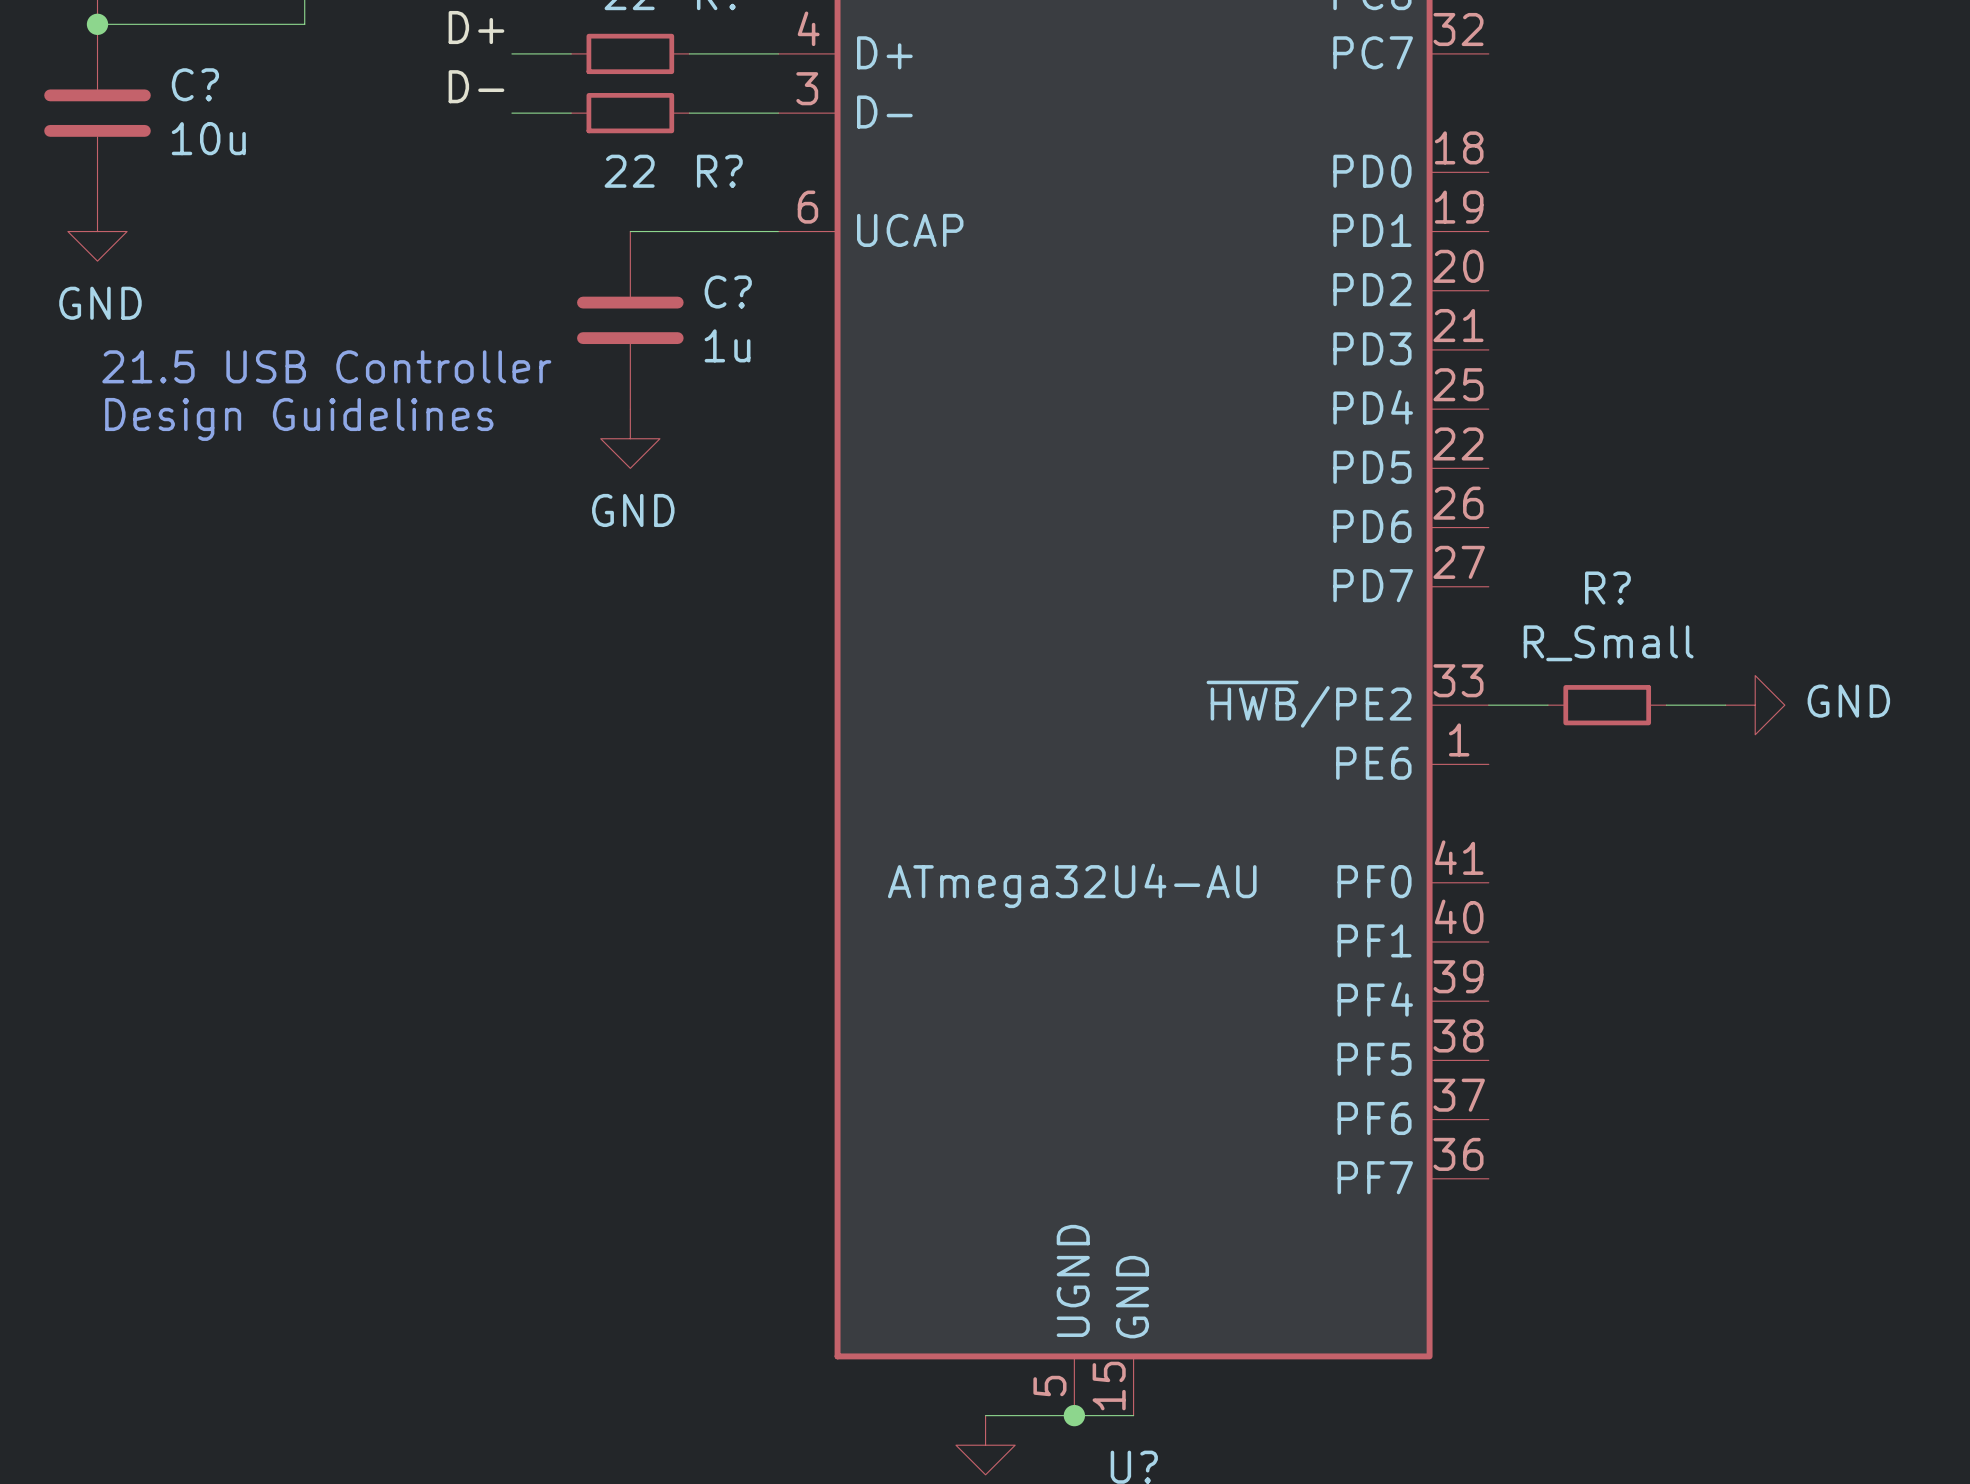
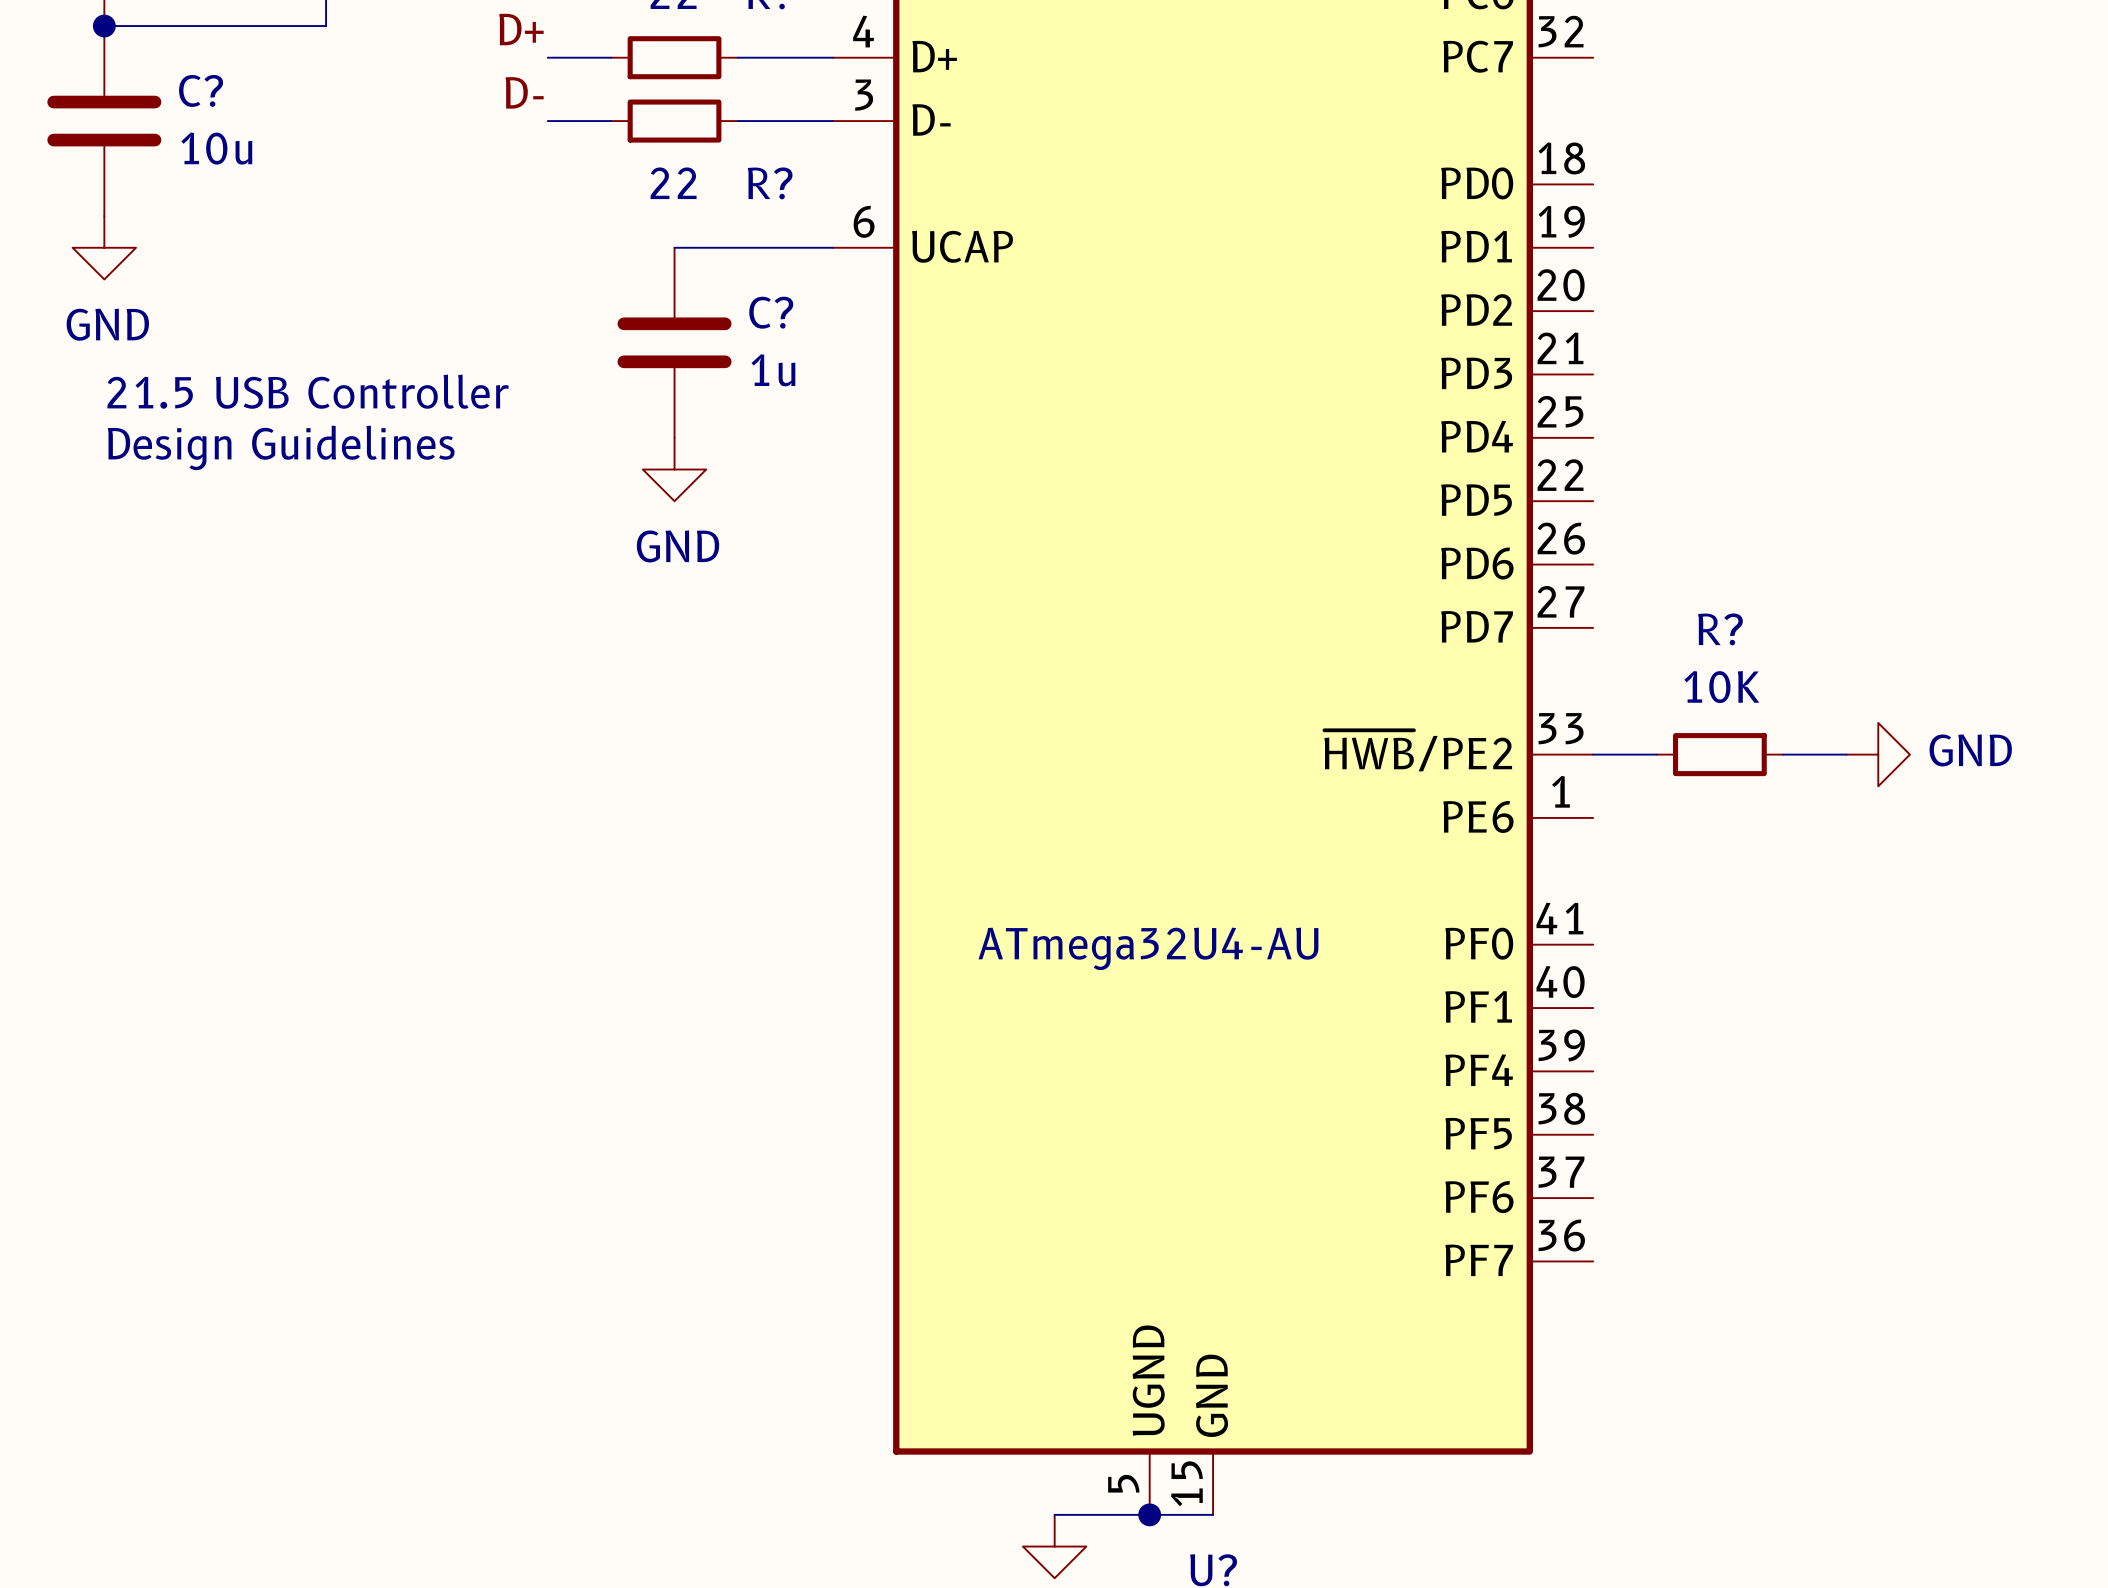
R? value: R_Small (1608, 643) -> 10K (1721, 687)

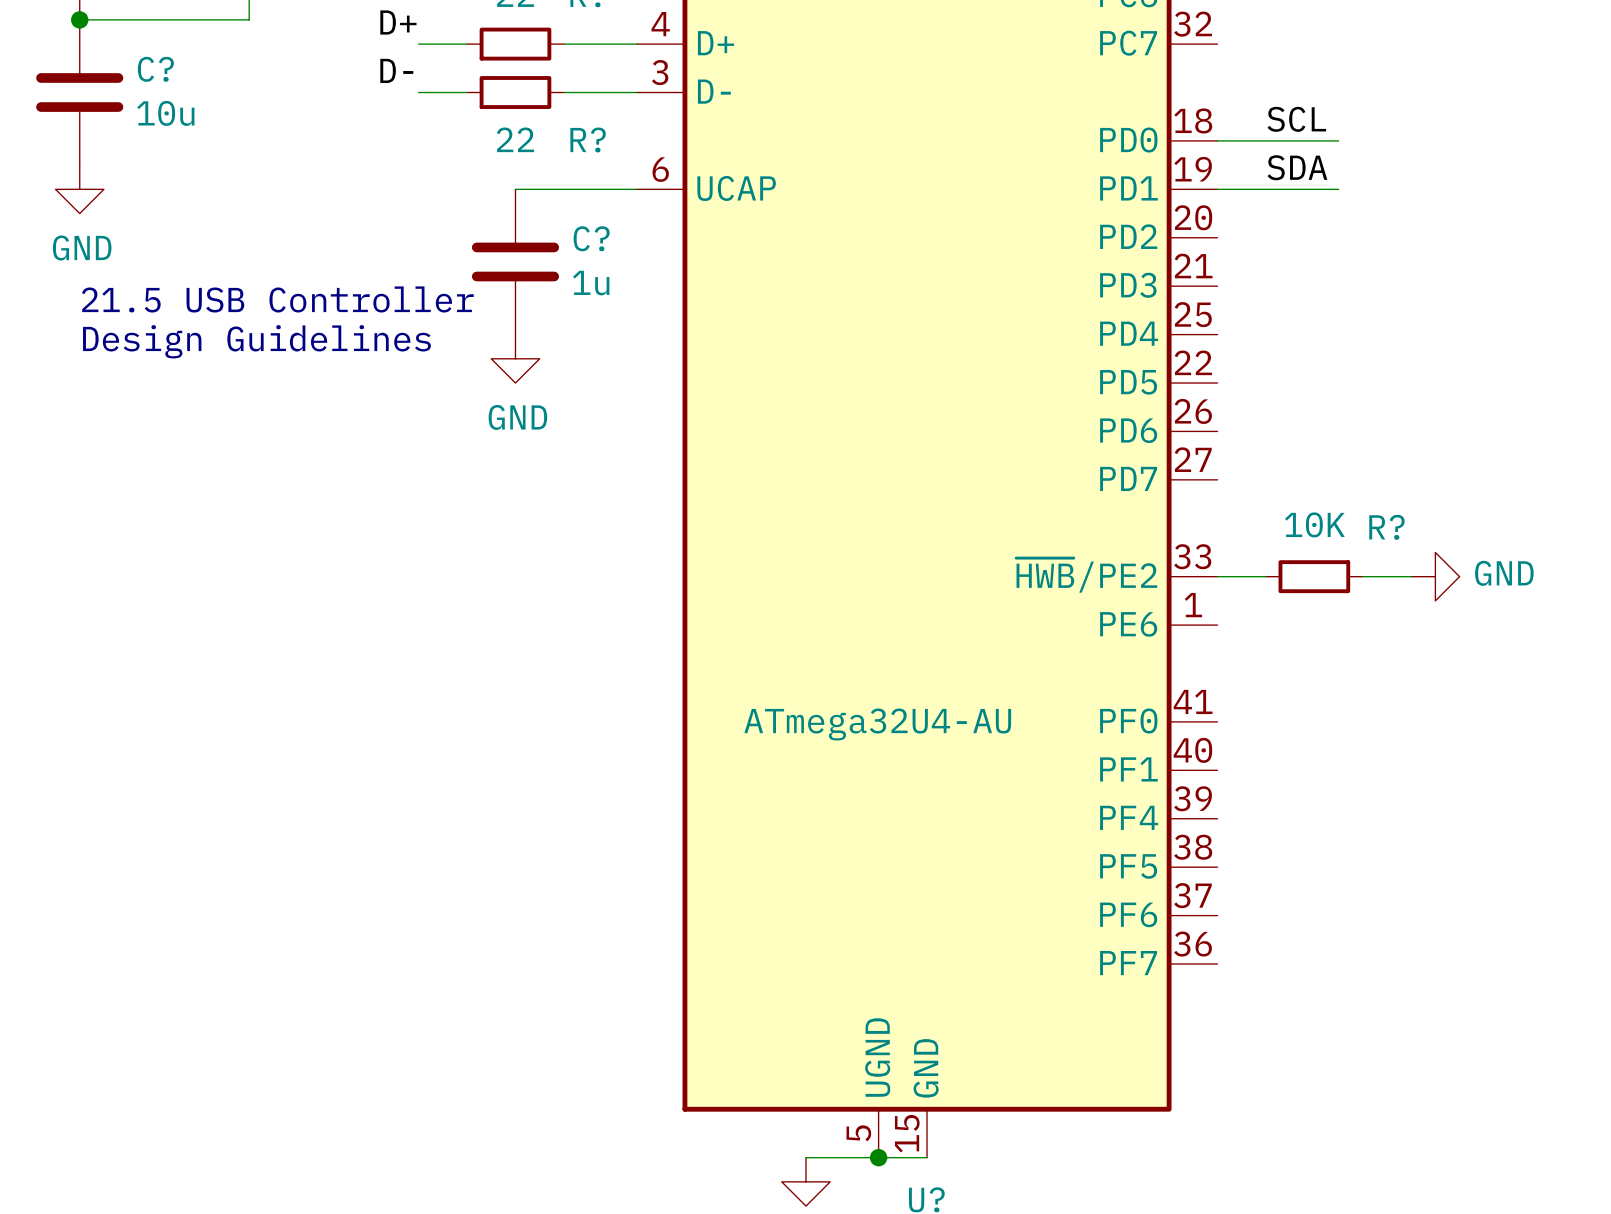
label: none -> SCL (1296, 119)
wire: none -> (1217, 140) (1338, 140)
label: none -> SDA (1297, 167)
wire: none -> (1217, 189) (1338, 189)
R? name position: R? (1720, 629) -> R? (1386, 527)

